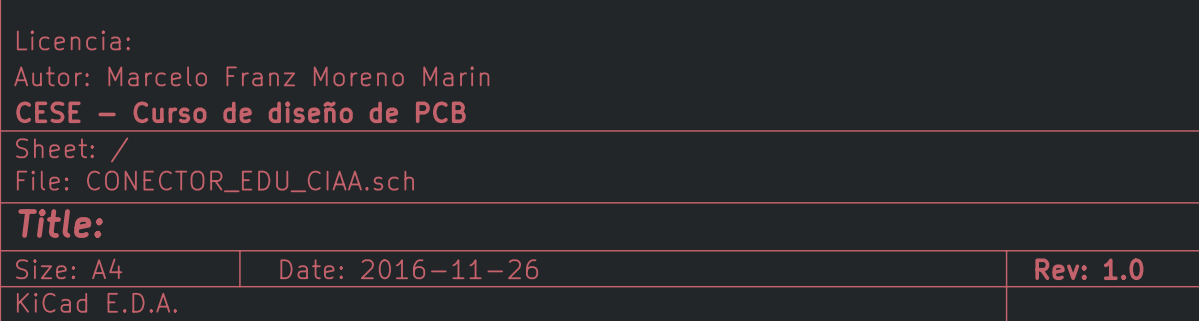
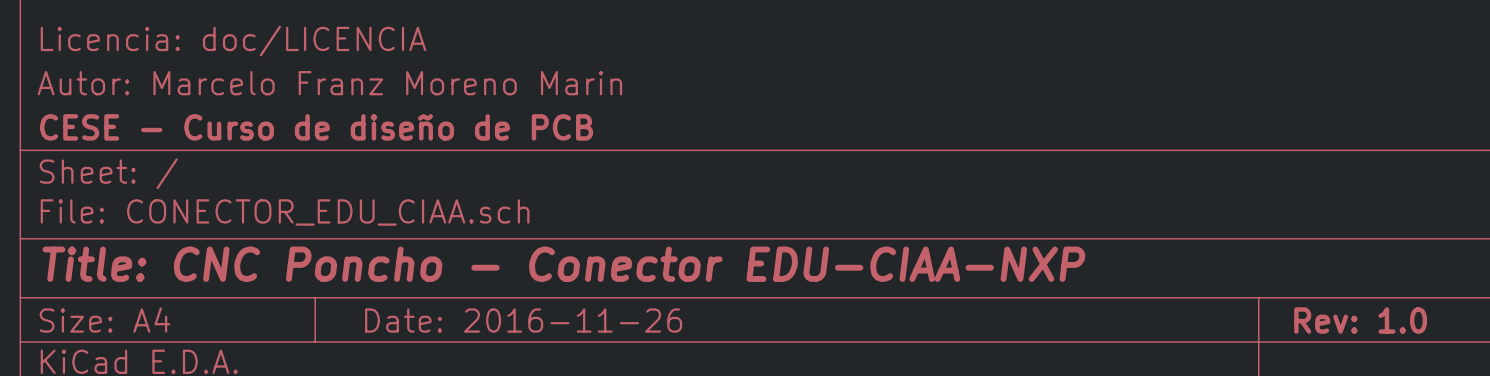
title block: Licencia: (73, 40) -> Licencia: doc/LICENCIA (233, 41)
title block: Title: (60, 223) -> Title: CNC Poncho - Conector EDU-CIAA-NXP (563, 264)

